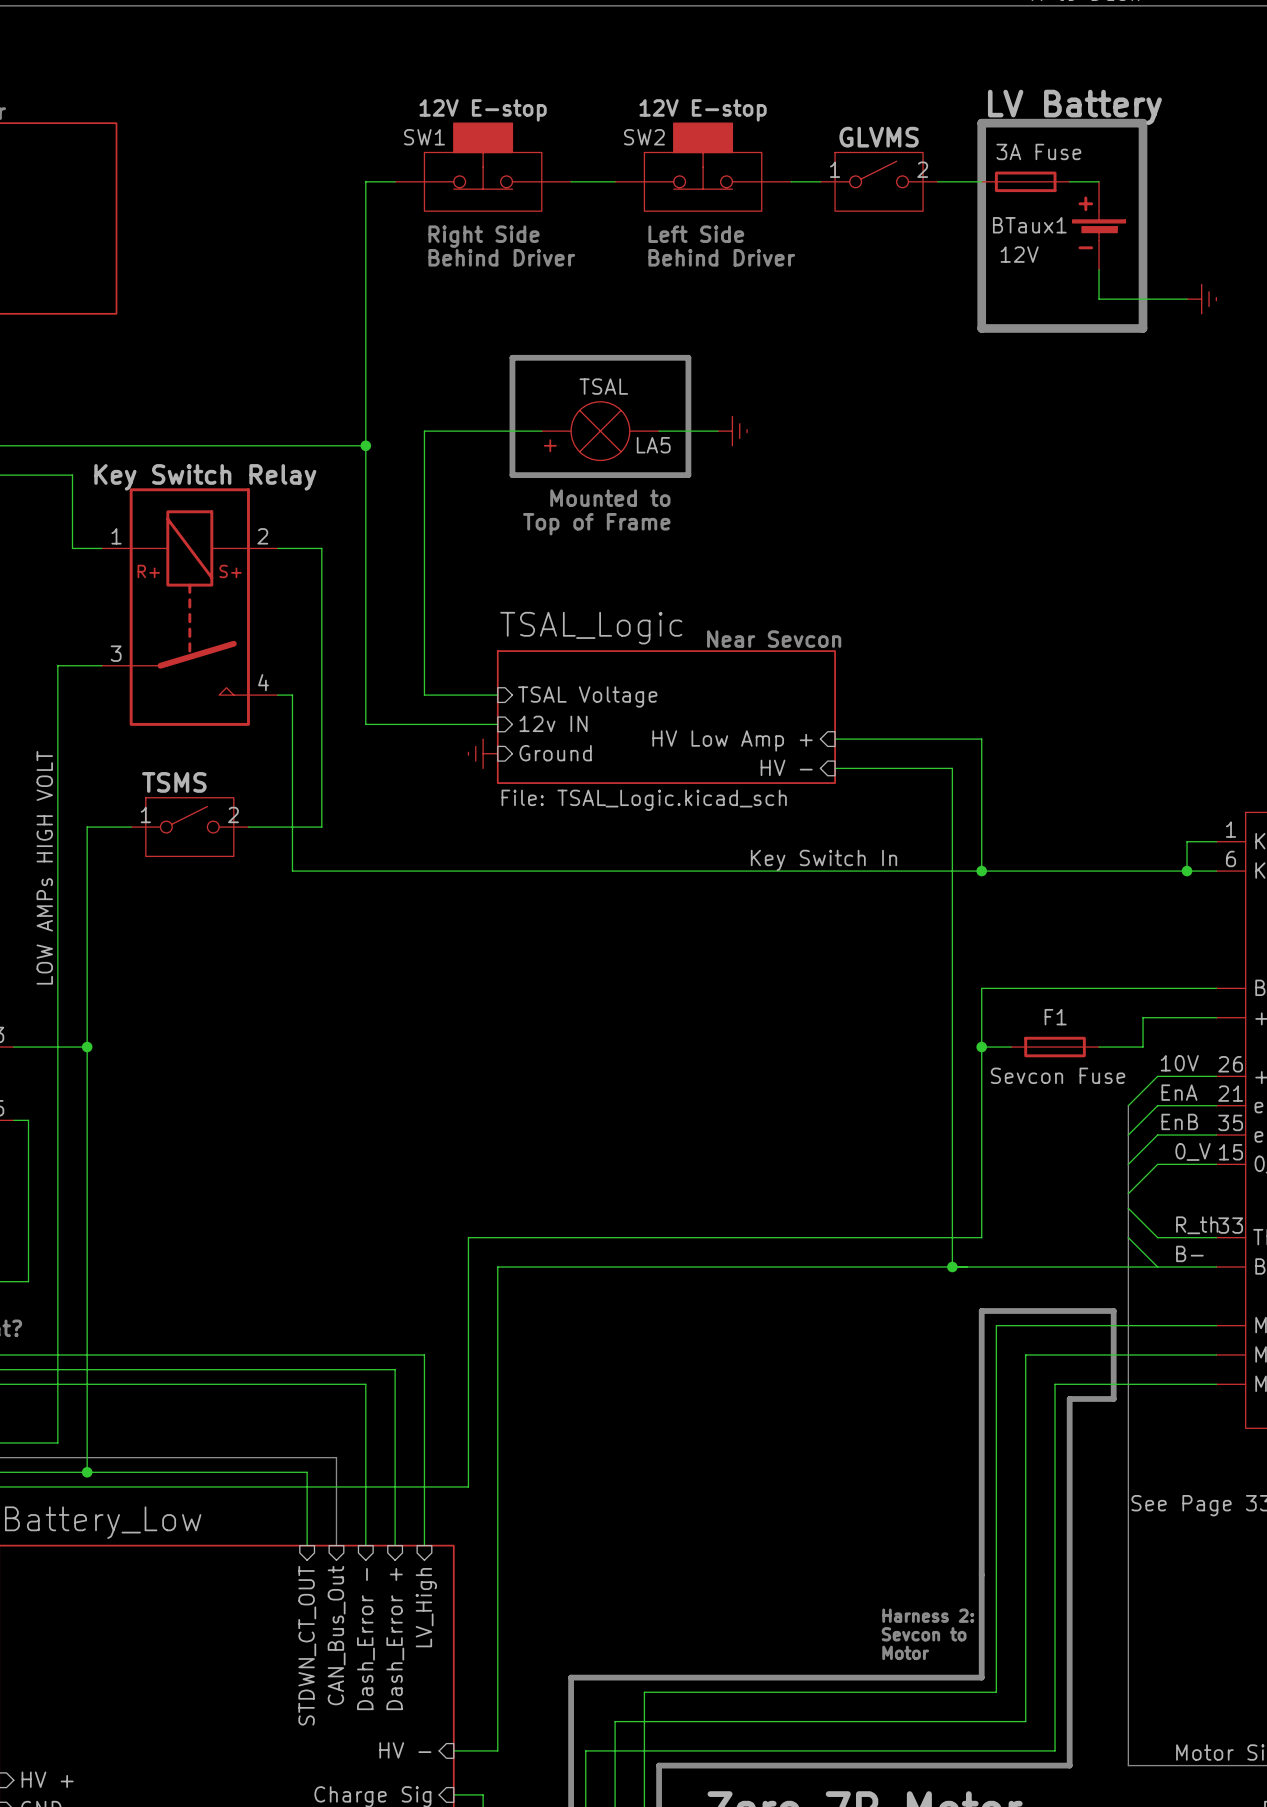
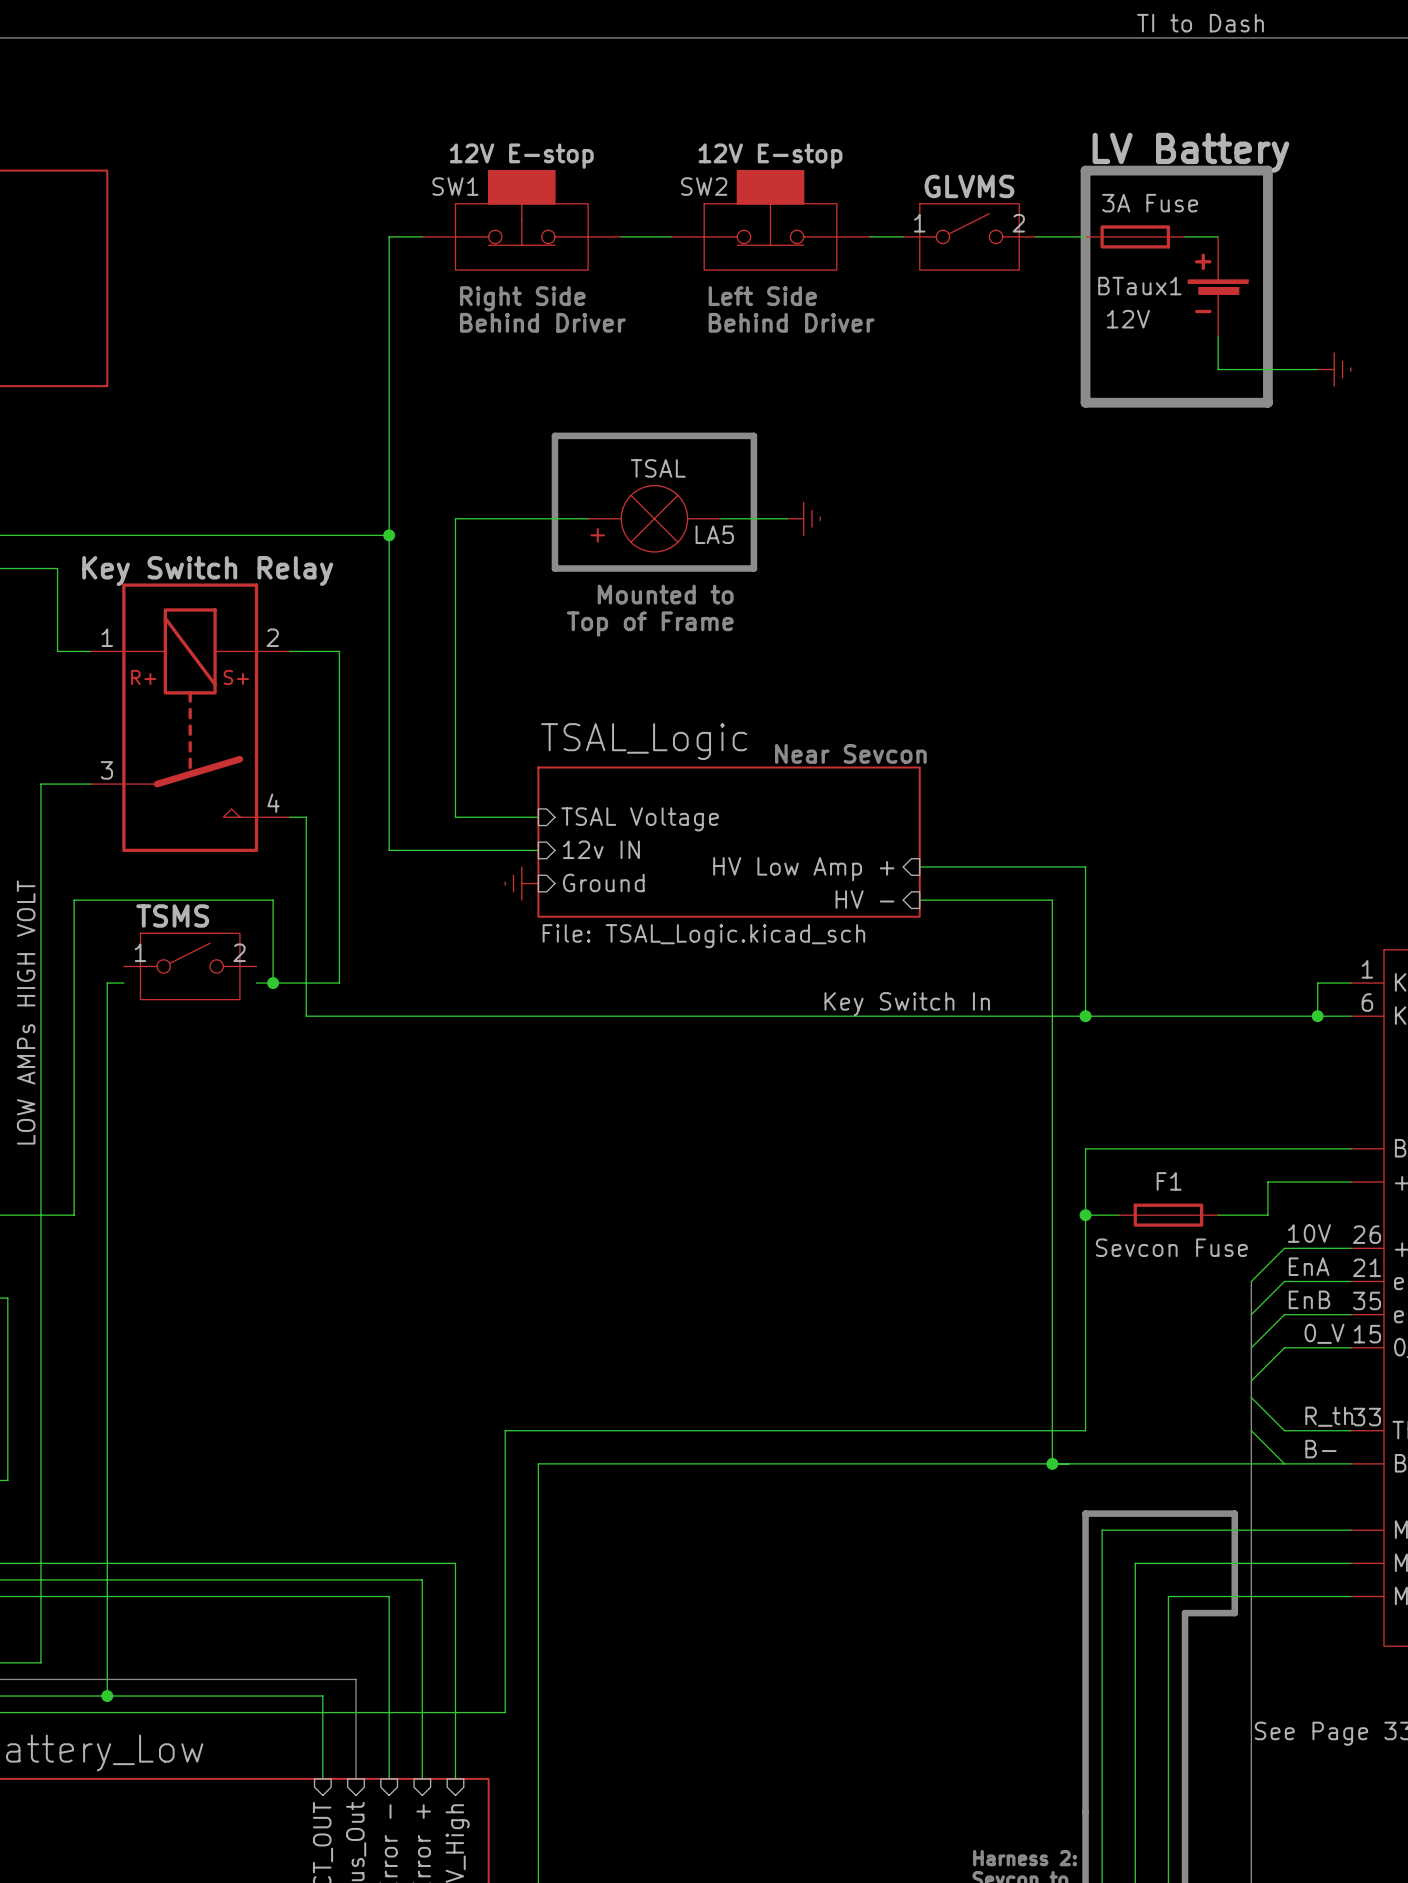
wire: (87, 827) (131, 827) -> (74, 966) (74, 900) (273, 900) (273, 983)
wire: (248, 827) (321, 827) -> (256, 983) (339, 983) (339, 966)
wire: none -> (123, 983) (107, 983) (107, 1696)
junction: none -> (273, 983)
wire: (87, 1047) (87, 1472) -> none
junction: (87, 1047) -> none
junction position: (87, 1472) -> (107, 1696)

